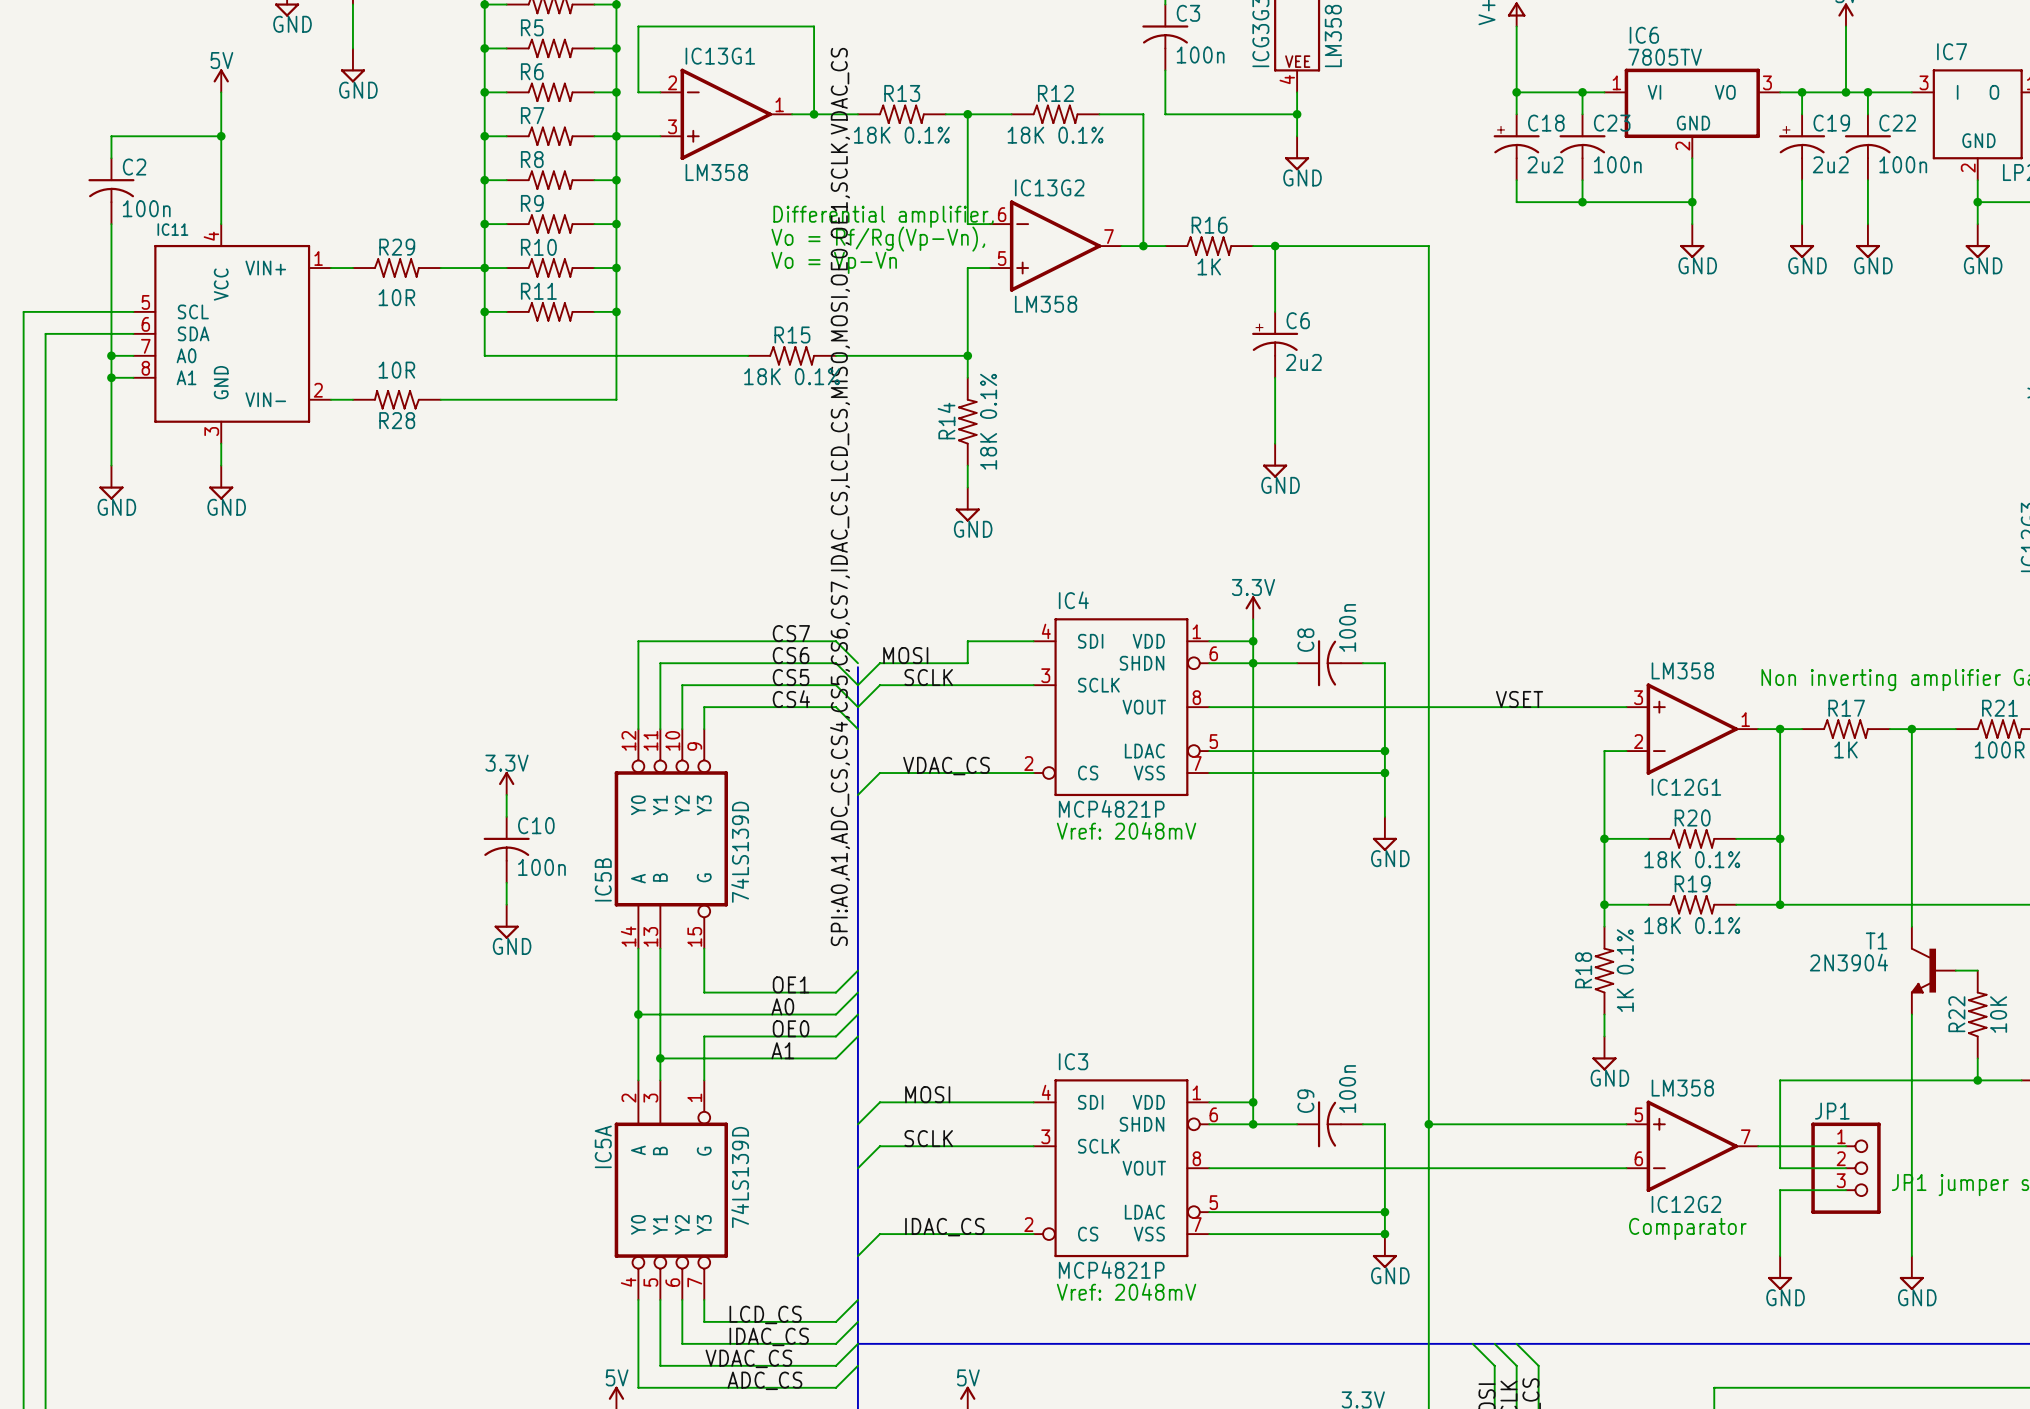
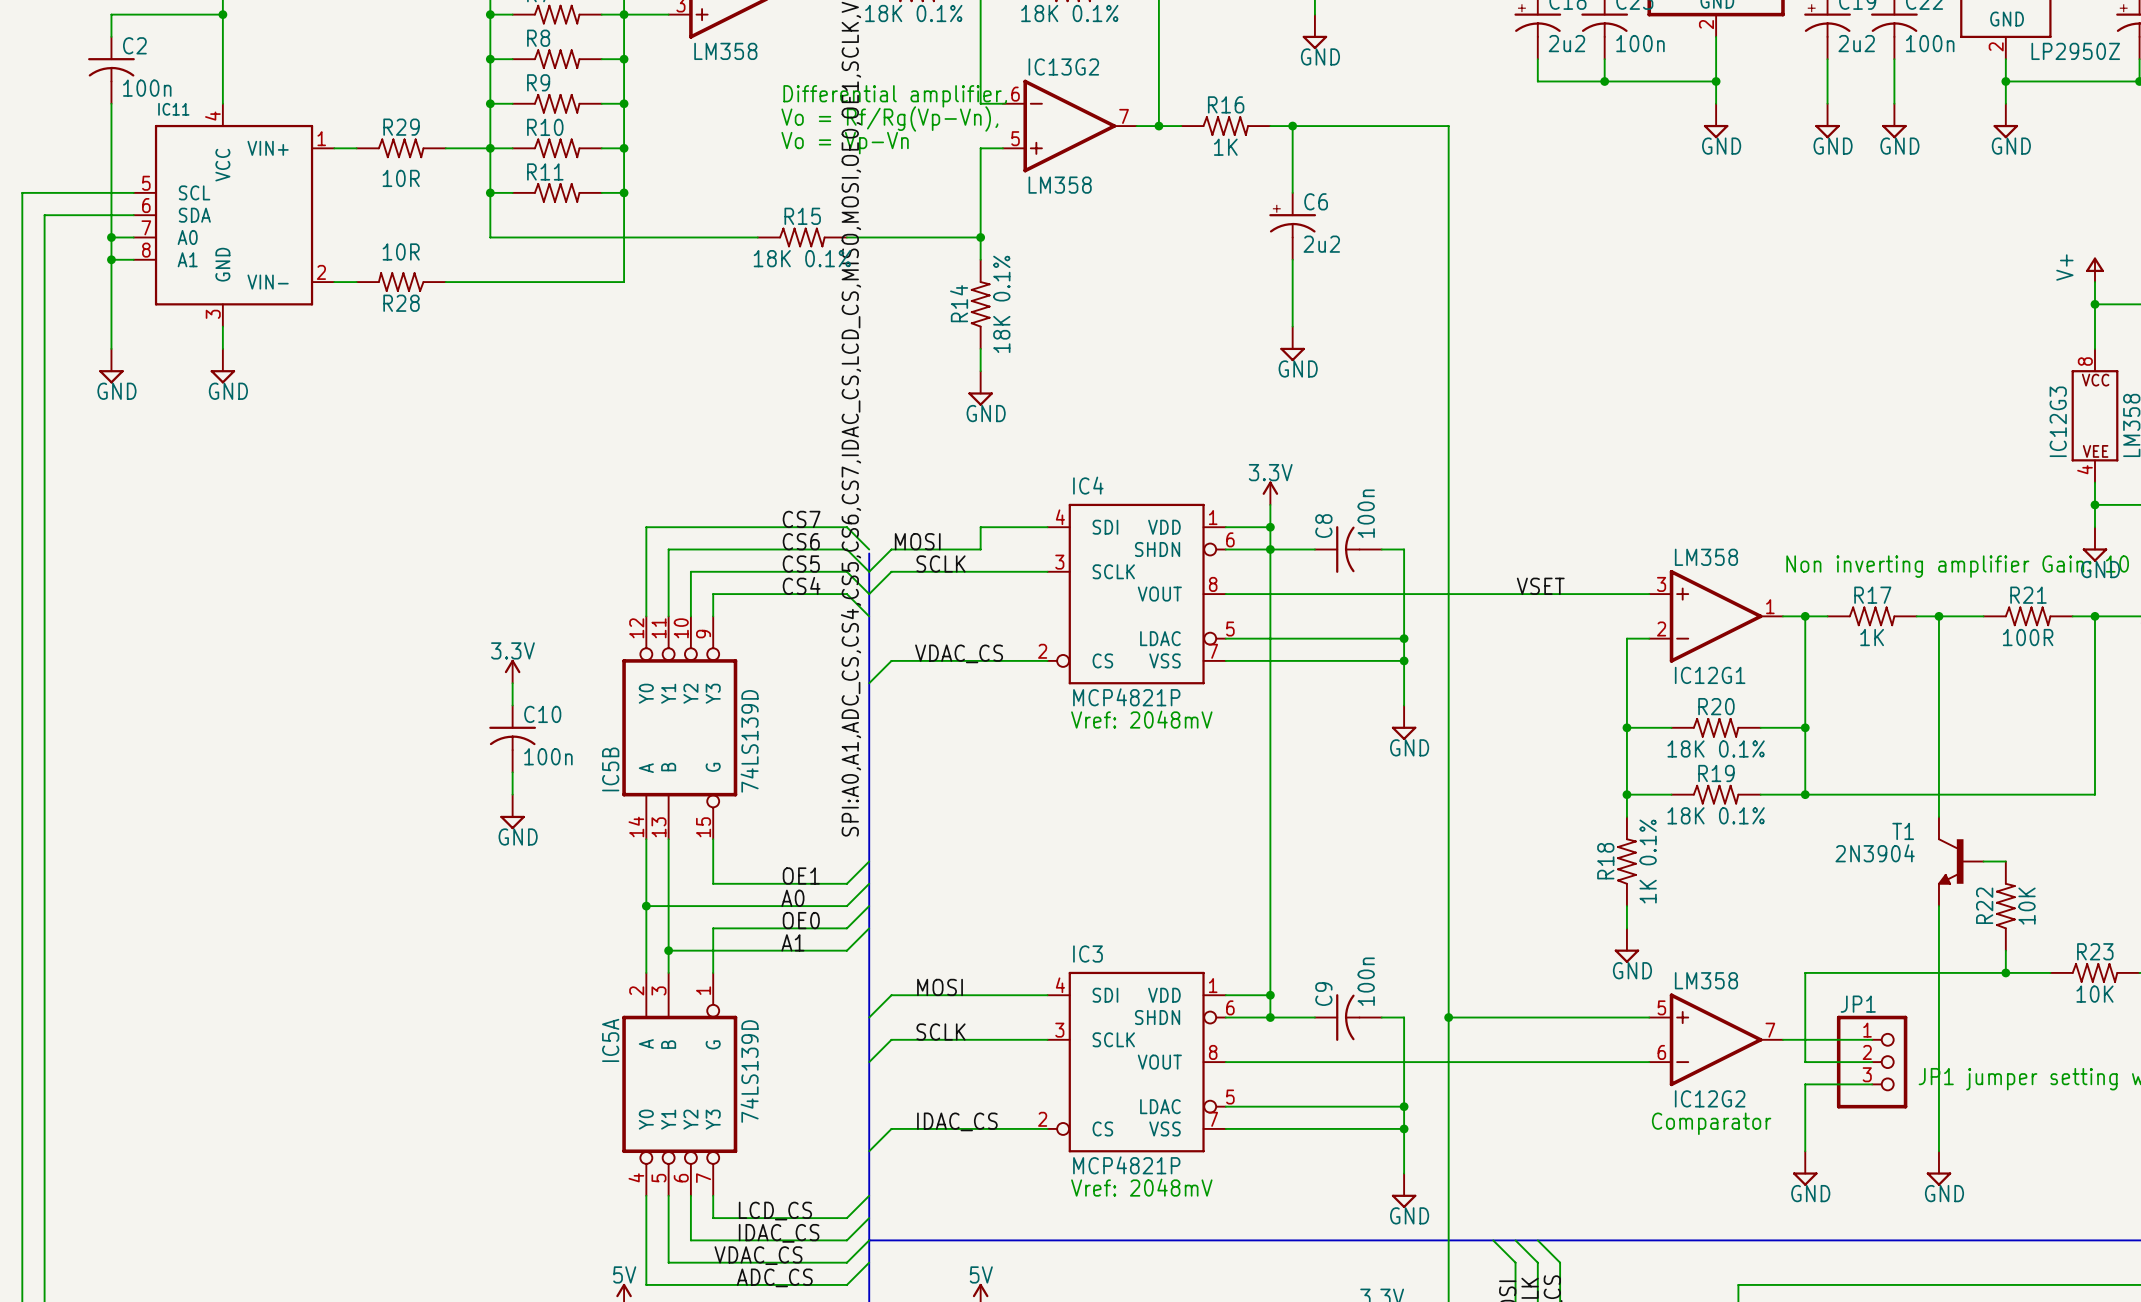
power symbol position: GND (1384, 1251) -> GND (1404, 1190)

